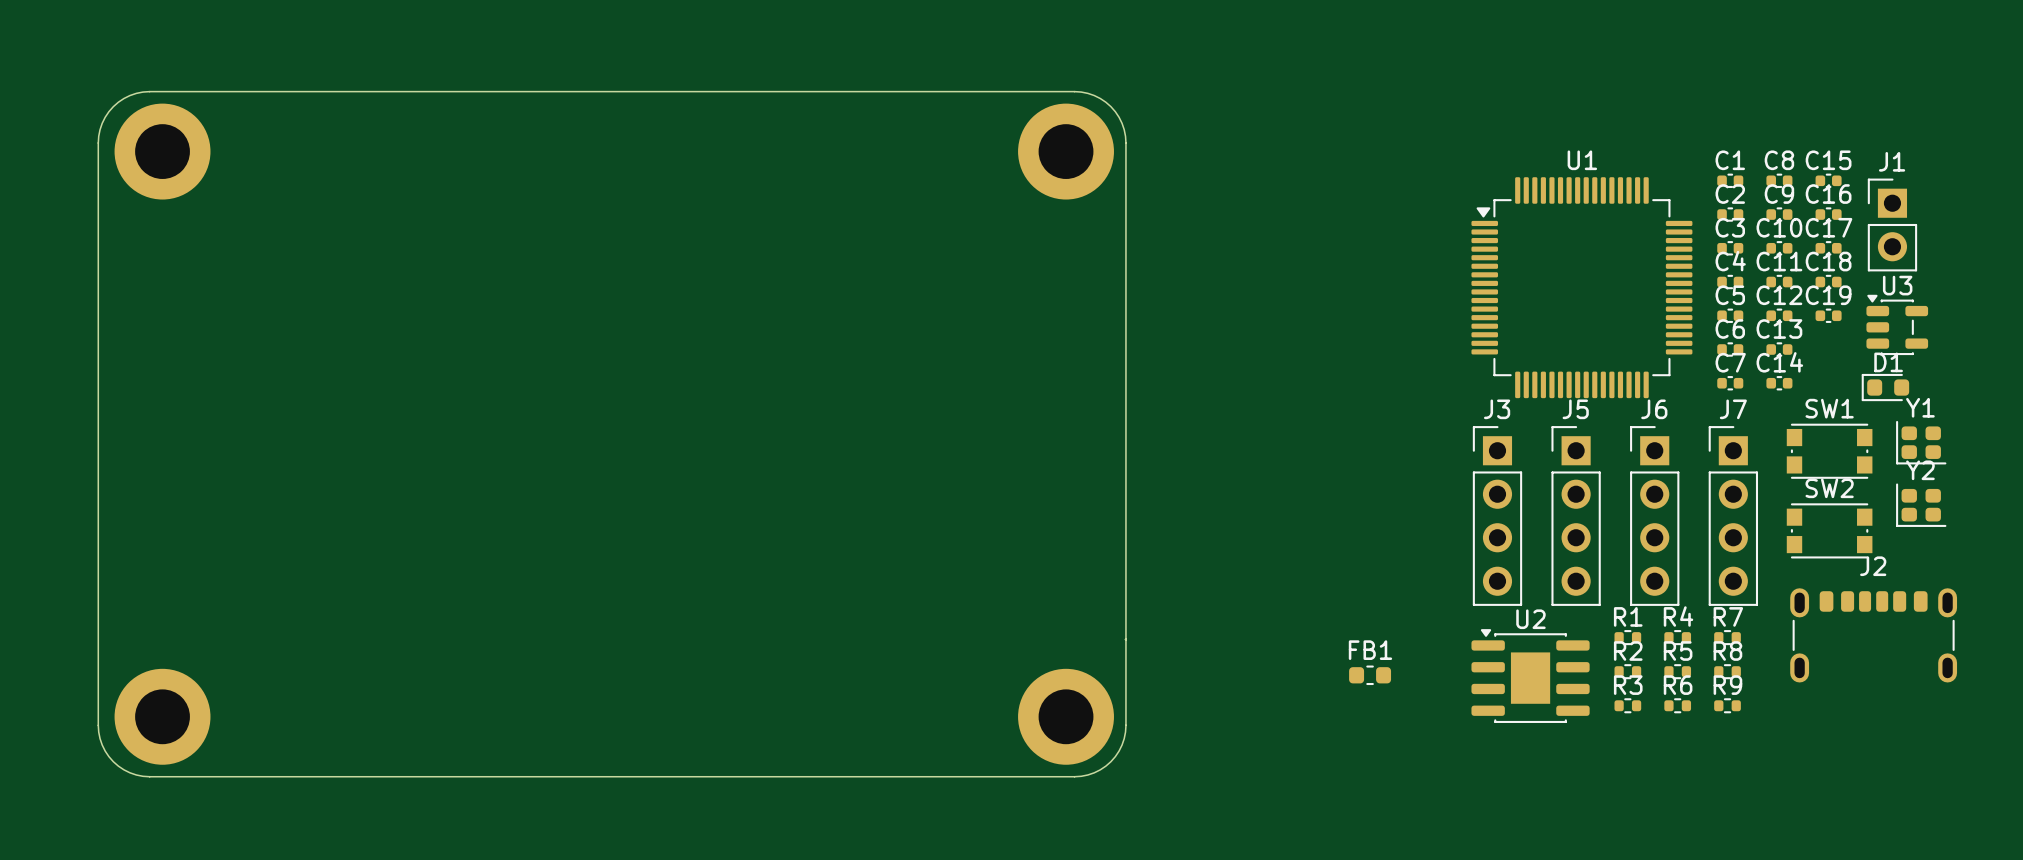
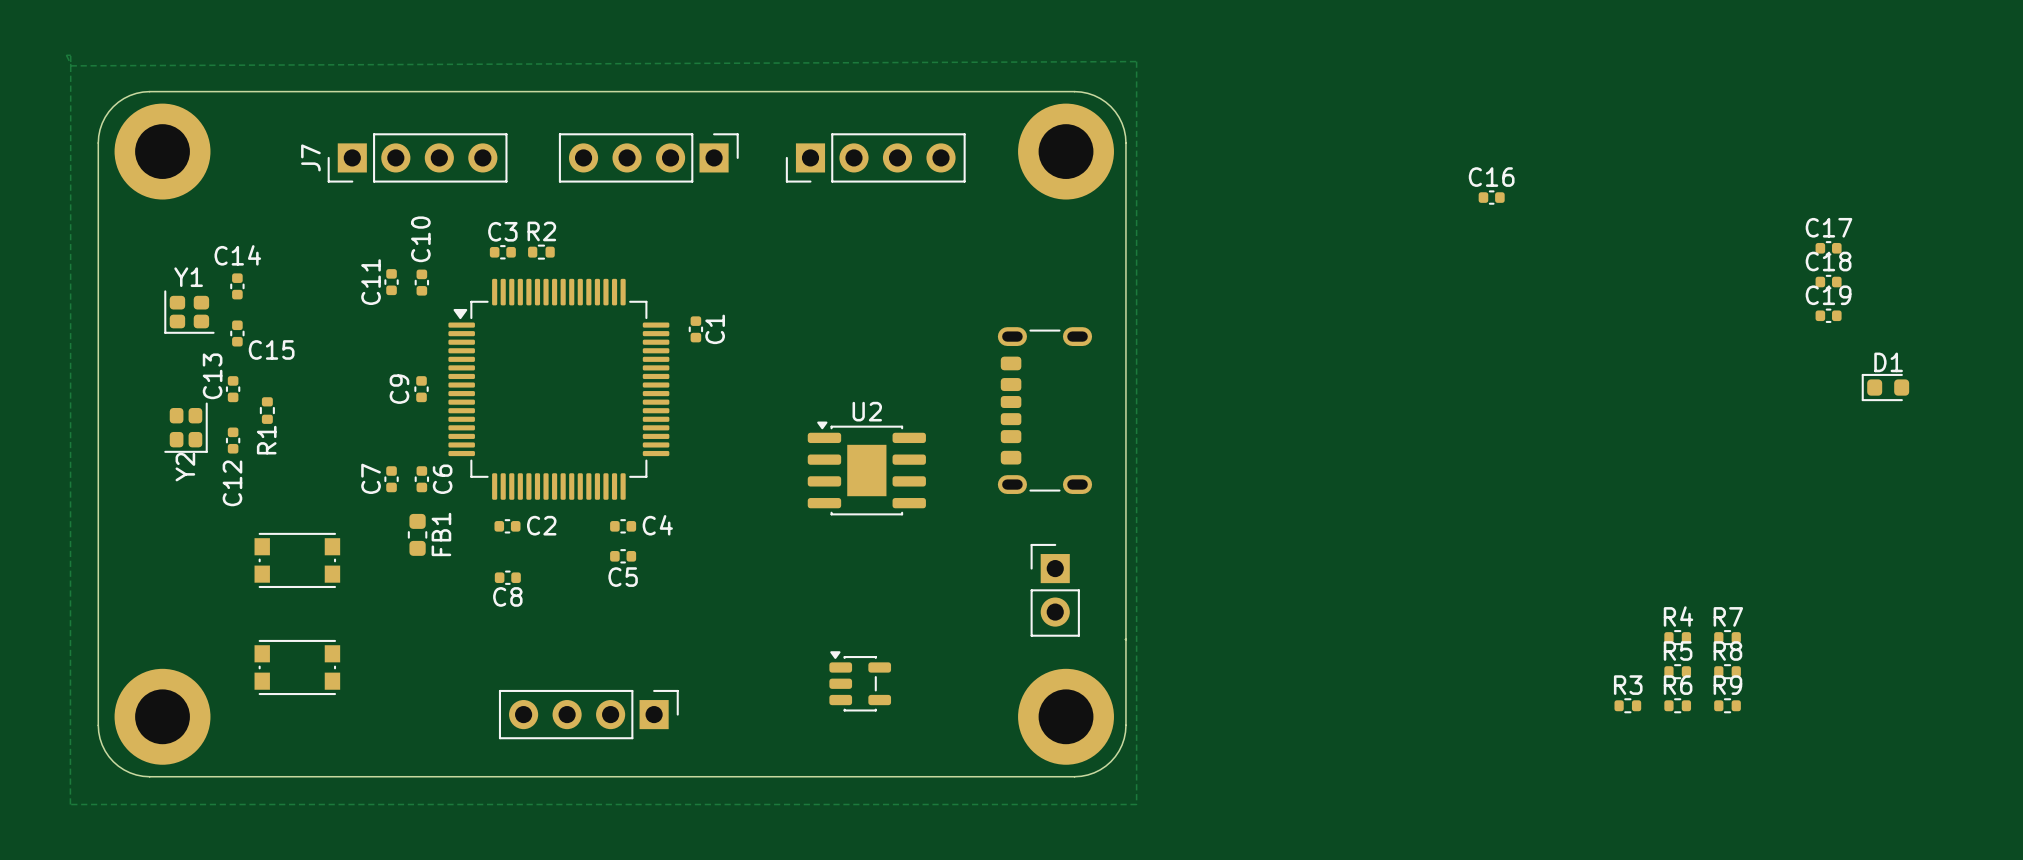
zone outline: none -> (66, 55) (70, 55) (70, 804) (1136, 804) (1136, 61) (70, 65) (70, 63) (66, 55)
part: none -> (648, 157)
part: none -> (875, 157)
C8 name position: C8 (1779, 160) -> C8 (507, 596)
C1 rotation: 0° (1730, 180) -> 90° clockwise (695, 329)
C1 position: (1730, 180) -> (695, 329)
C8 position: (1779, 180) -> (507, 577)
C15 rotation: 0° (1828, 180) -> 90° clockwise (237, 333)
C15 position: (1828, 180) -> (237, 333)
C2 name position: C2 (1730, 194) -> C2 (541, 525)
C2 position: (1730, 214) -> (507, 526)
C9 rotation: 0° (1779, 214) -> 90° clockwise (421, 389)
C9 position: (1779, 214) -> (421, 389)
C16 position: (1828, 214) -> (1491, 197)
J1: (1892, 224) -> none
C3 position: (1730, 248) -> (502, 252)
C10 rotation: 0° (1779, 248) -> 90° clockwise (421, 282)
C10 position: (1779, 248) -> (421, 282)
C4 name position: C4 (1730, 261) -> C4 (657, 525)
C4 position: (1730, 282) -> (623, 526)
C11 rotation: 0° (1779, 282) -> 90° clockwise (391, 282)
C11 position: (1779, 282) -> (391, 282)
U1: (1581, 287) -> none
C5 name position: C5 (1730, 295) -> C5 (623, 577)
C12 name position: C12 (1779, 295) -> C12 (232, 483)
C5 position: (1730, 315) -> (623, 556)
C12 rotation: 0° (1779, 315) -> 90° clockwise (233, 440)
C12 position: (1779, 315) -> (233, 440)
U3: (1897, 324) -> none
C6 rotation: 0° (1730, 349) -> 90° clockwise (421, 479)
C6 position: (1730, 349) -> (421, 479)
C13 rotation: 0° (1779, 349) -> 90° clockwise (233, 389)
C13 position: (1779, 349) -> (233, 389)
C7 rotation: 0° (1730, 383) -> 90° clockwise (391, 479)
C7 position: (1730, 383) -> (391, 479)
C14 rotation: 0° (1779, 383) -> 90° clockwise (237, 286)
C14 position: (1779, 383) -> (237, 286)
part: none -> (558, 389)
part: none -> (1044, 410)
Y1 position: (1921, 442) -> (189, 312)
SW1: (1829, 451) -> none
Y2 name position: Y2 (1920, 470) -> Y2 (185, 467)
Y2 rotation: 0° (1921, 505) -> 90° counterclockwise (186, 427)
Y2 position: (1921, 505) -> (186, 427)
J3: (1497, 515) -> none
J5: (1576, 515) -> none
J6: (1654, 515) -> none
J7 rotation: 0° (1733, 515) -> 90° counterclockwise (417, 157)
J7 position: (1733, 515) -> (417, 157)
SW2: (1829, 530) -> none
part: none -> (297, 560)
part: none -> (1055, 590)
R1 name position: R1 (1628, 616) -> R1 (266, 440)
J2: (1873, 635) -> none
R1 rotation: 0° (1627, 637) -> 90° clockwise (267, 410)
R1 position: (1627, 637) -> (267, 410)
part: none -> (297, 667)
R2 position: (1627, 671) -> (541, 252)
FB1 rotation: 0° (1370, 675) -> 90° clockwise (417, 534)
FB1 position: (1370, 675) -> (417, 534)
U2 position: (1530, 676) -> (866, 468)
part: none -> (860, 681)
part: none -> (588, 714)

